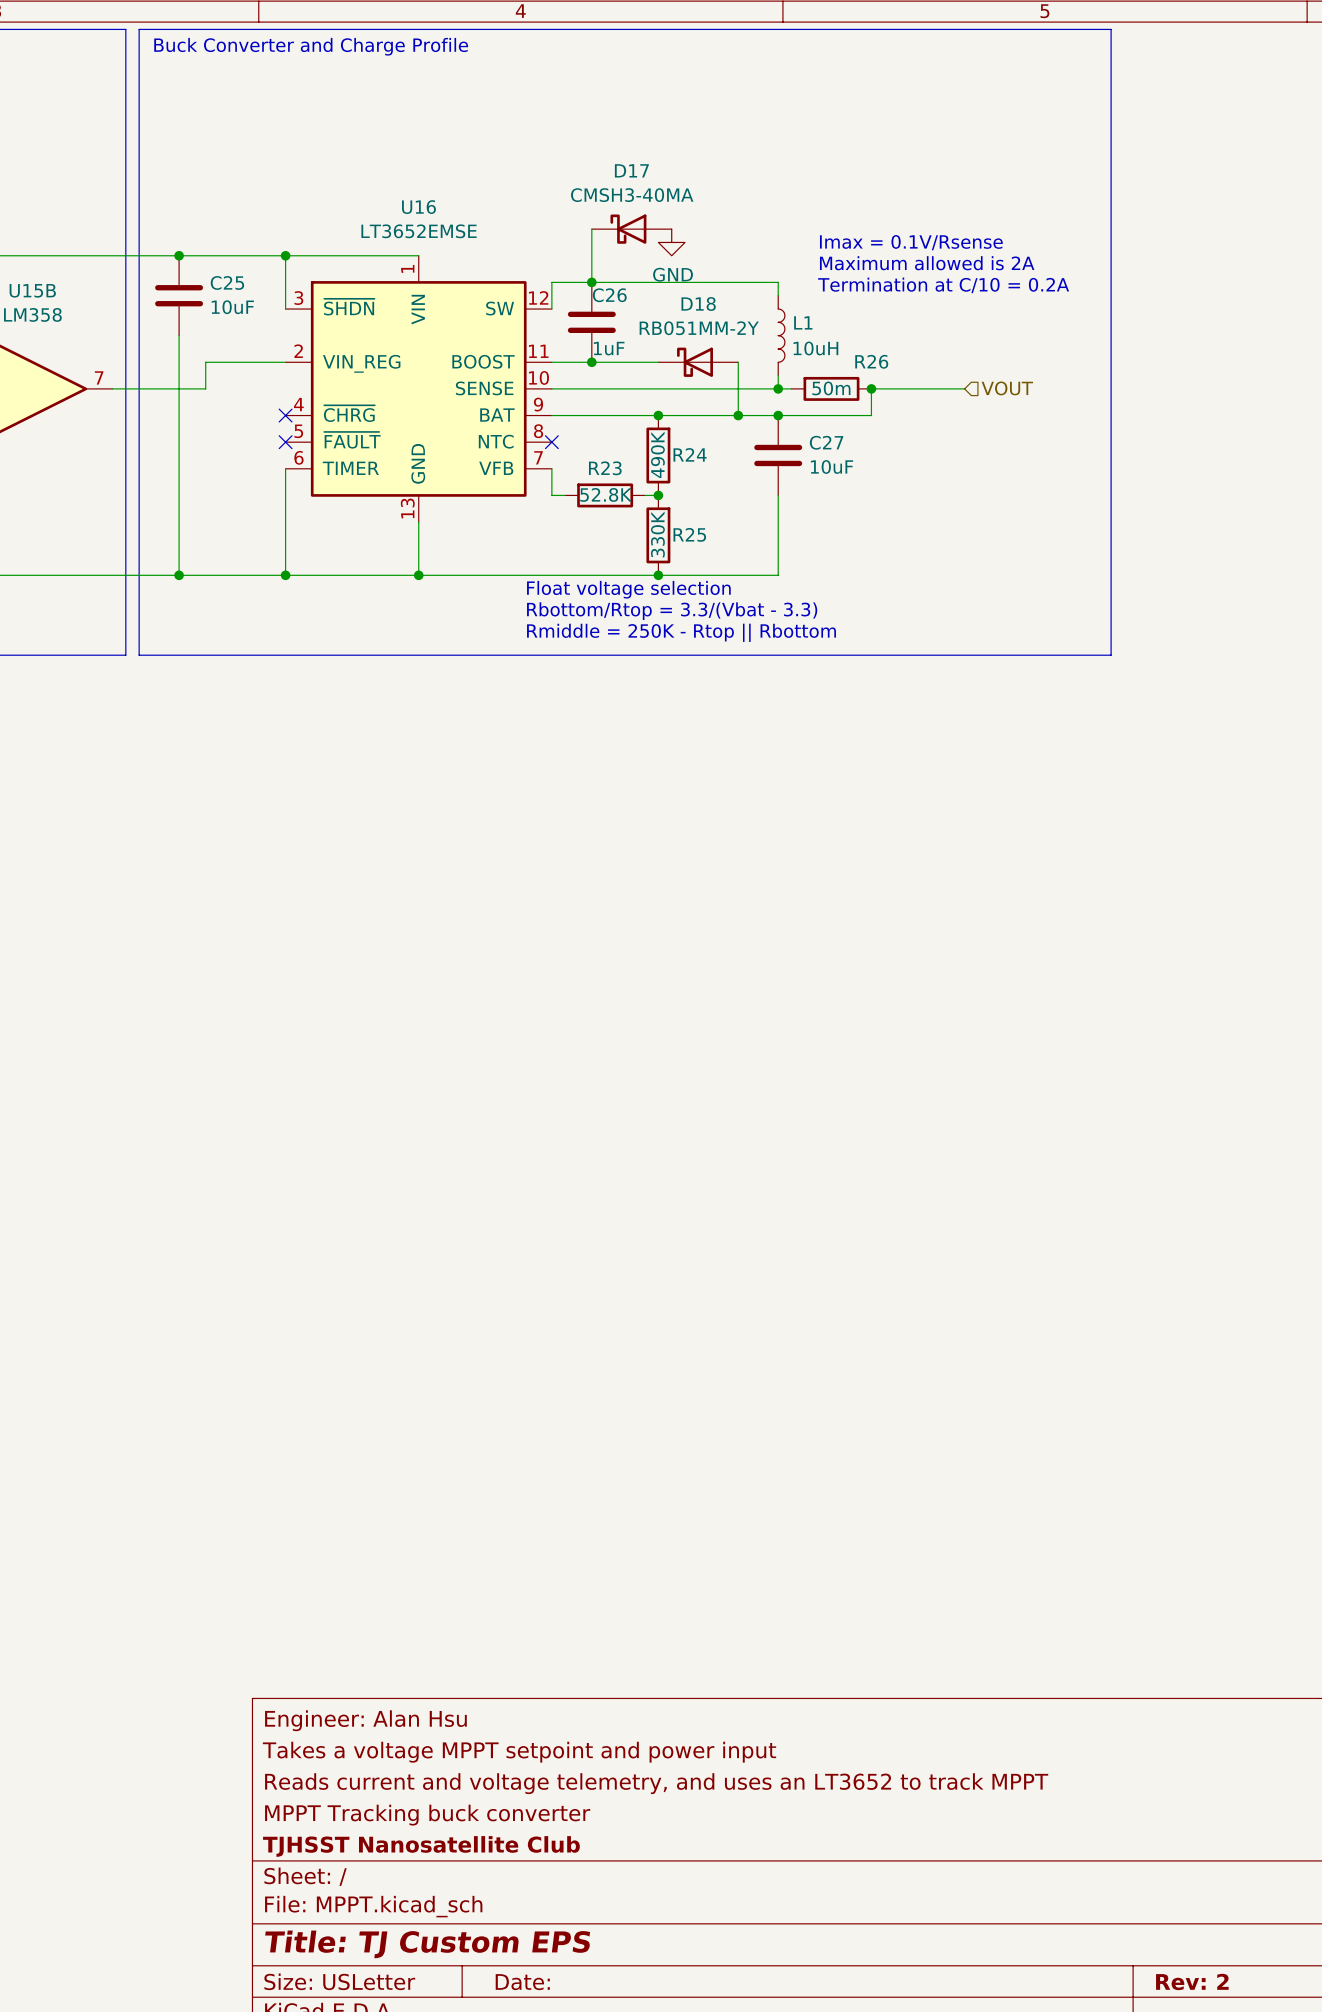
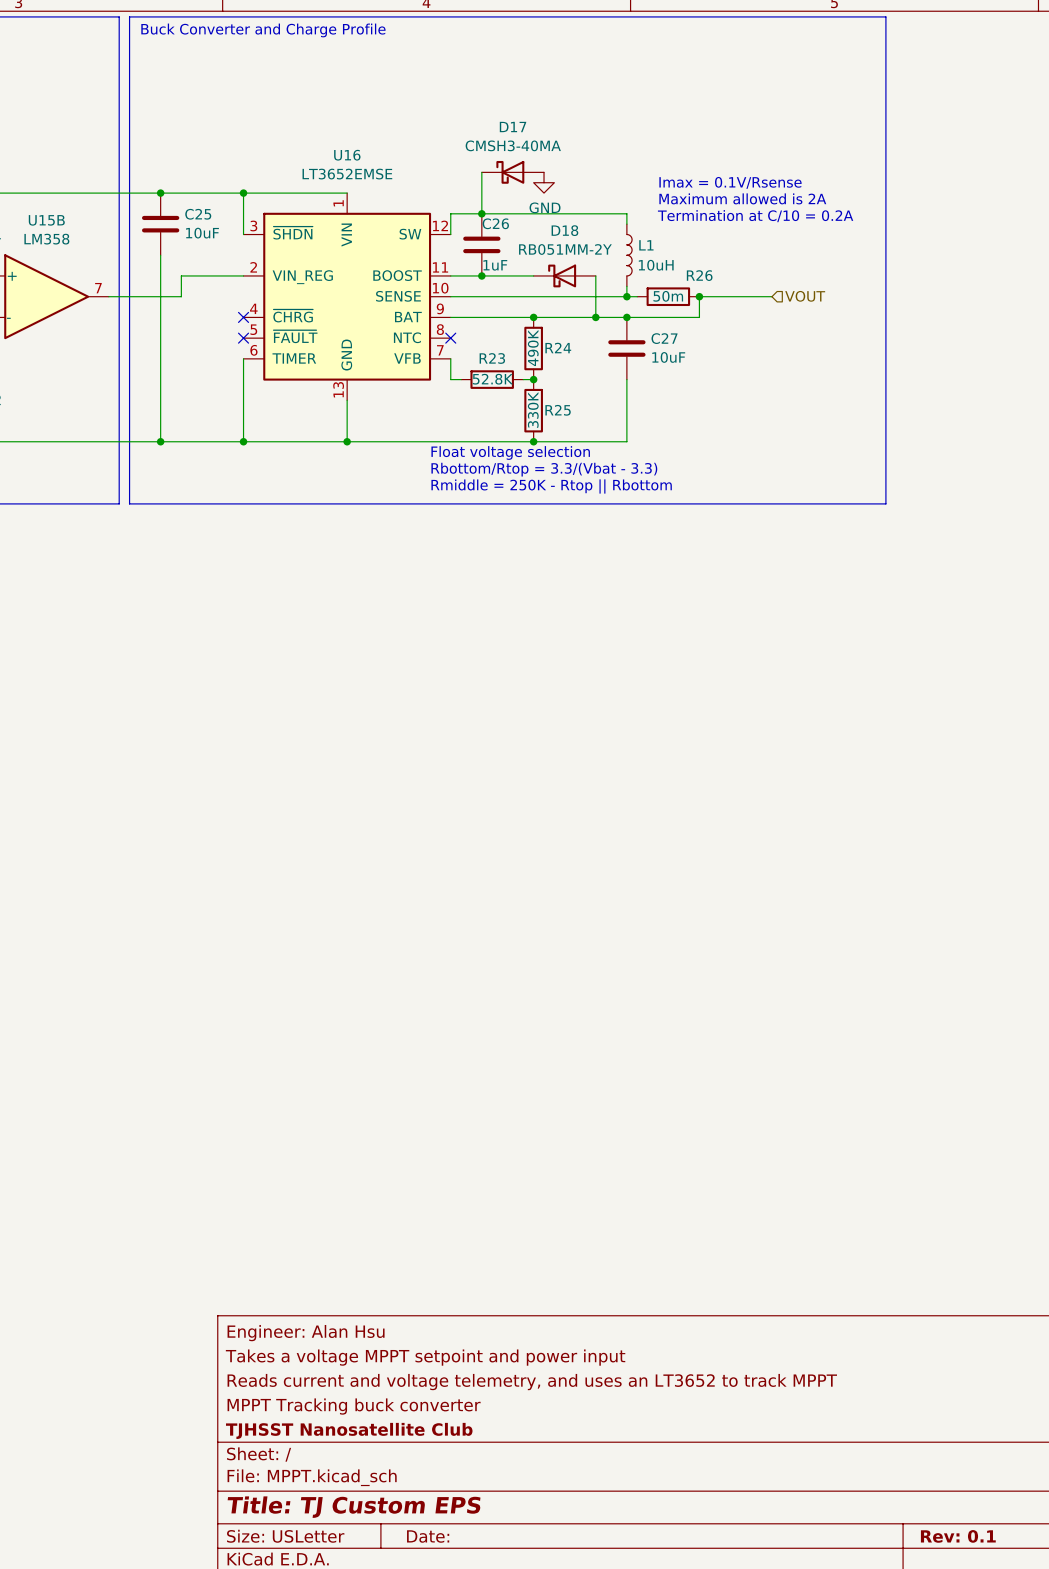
title block: Rev: 2 (1192, 1981) -> Rev: 0.1 (958, 1536)

